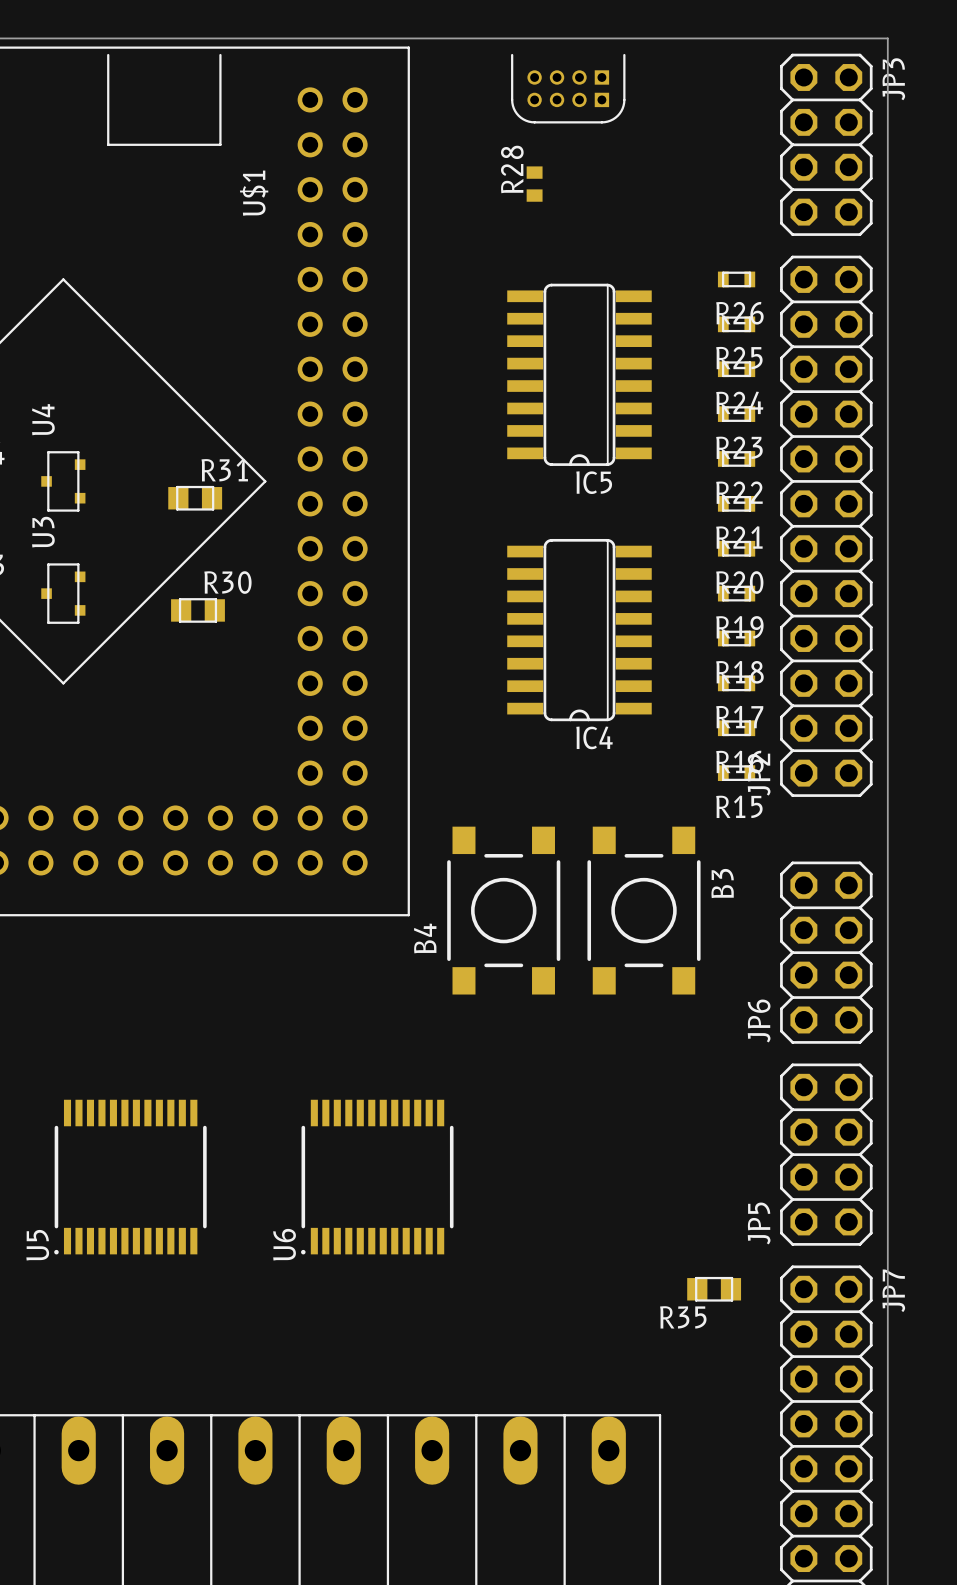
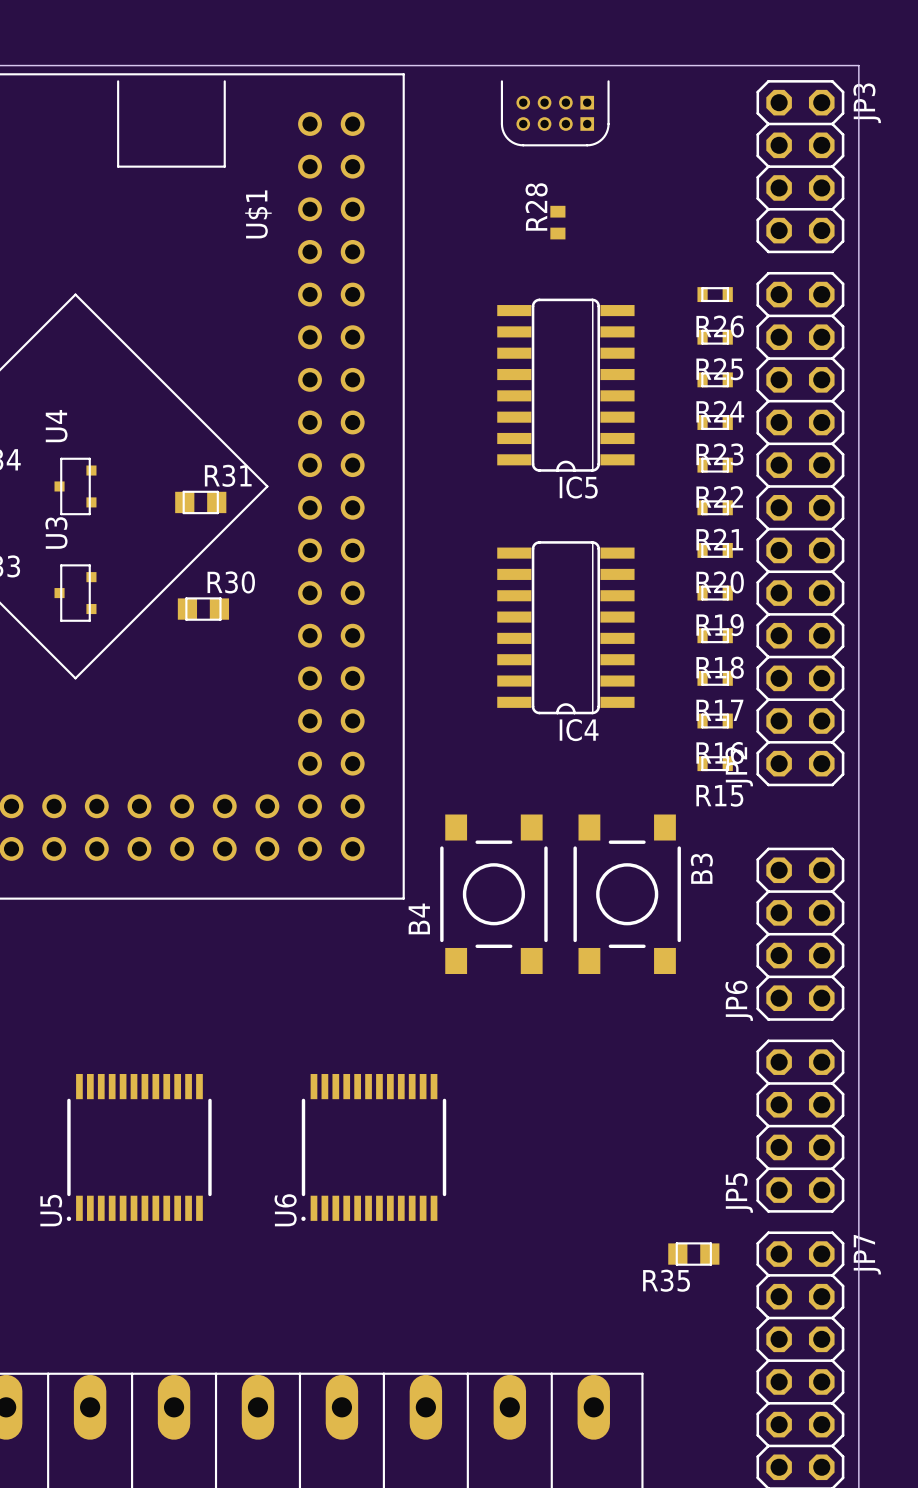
R28 position: (534, 184) -> (557, 222)

